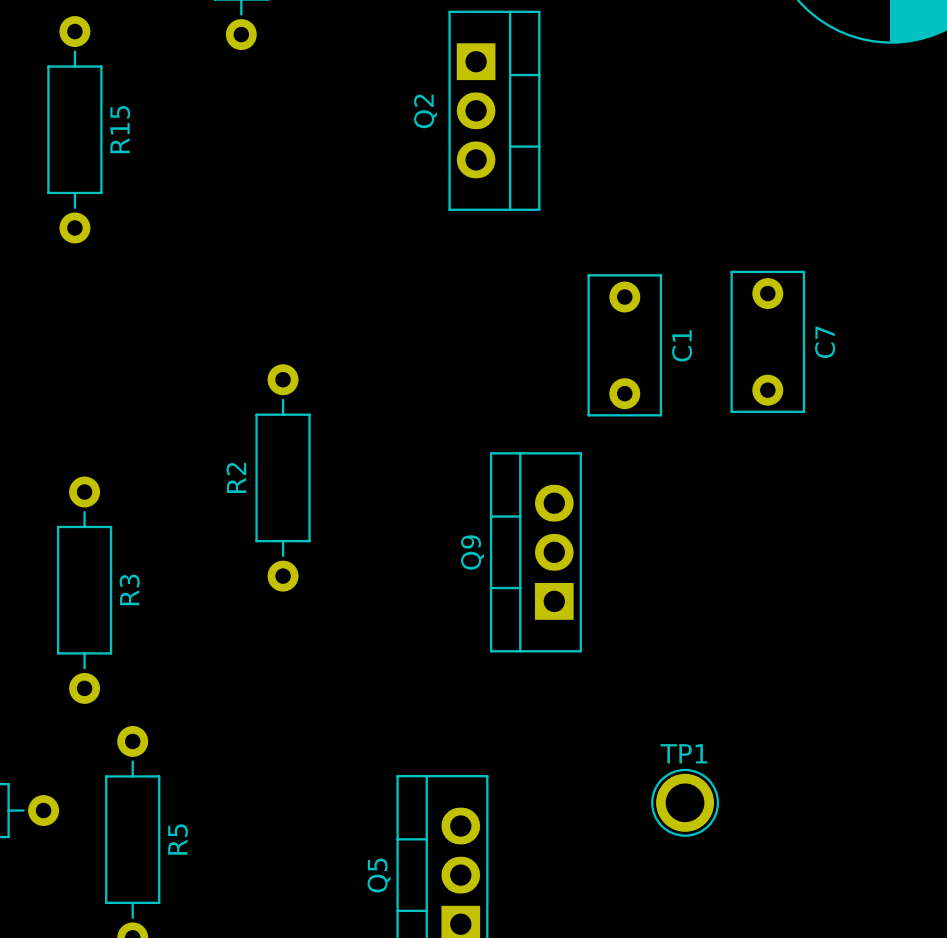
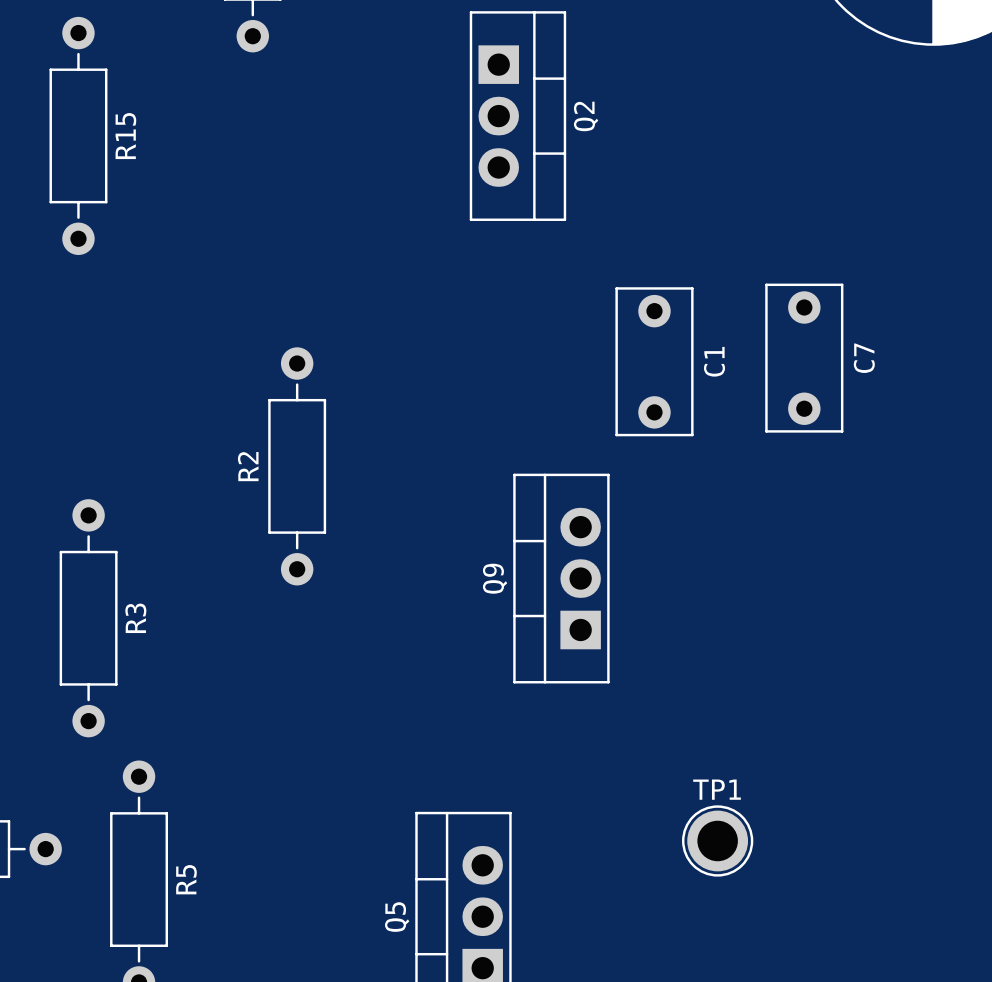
Q2 name position: Q2 (425, 111) -> Q2 (586, 116)
R2 position: (283, 477) -> (297, 466)

